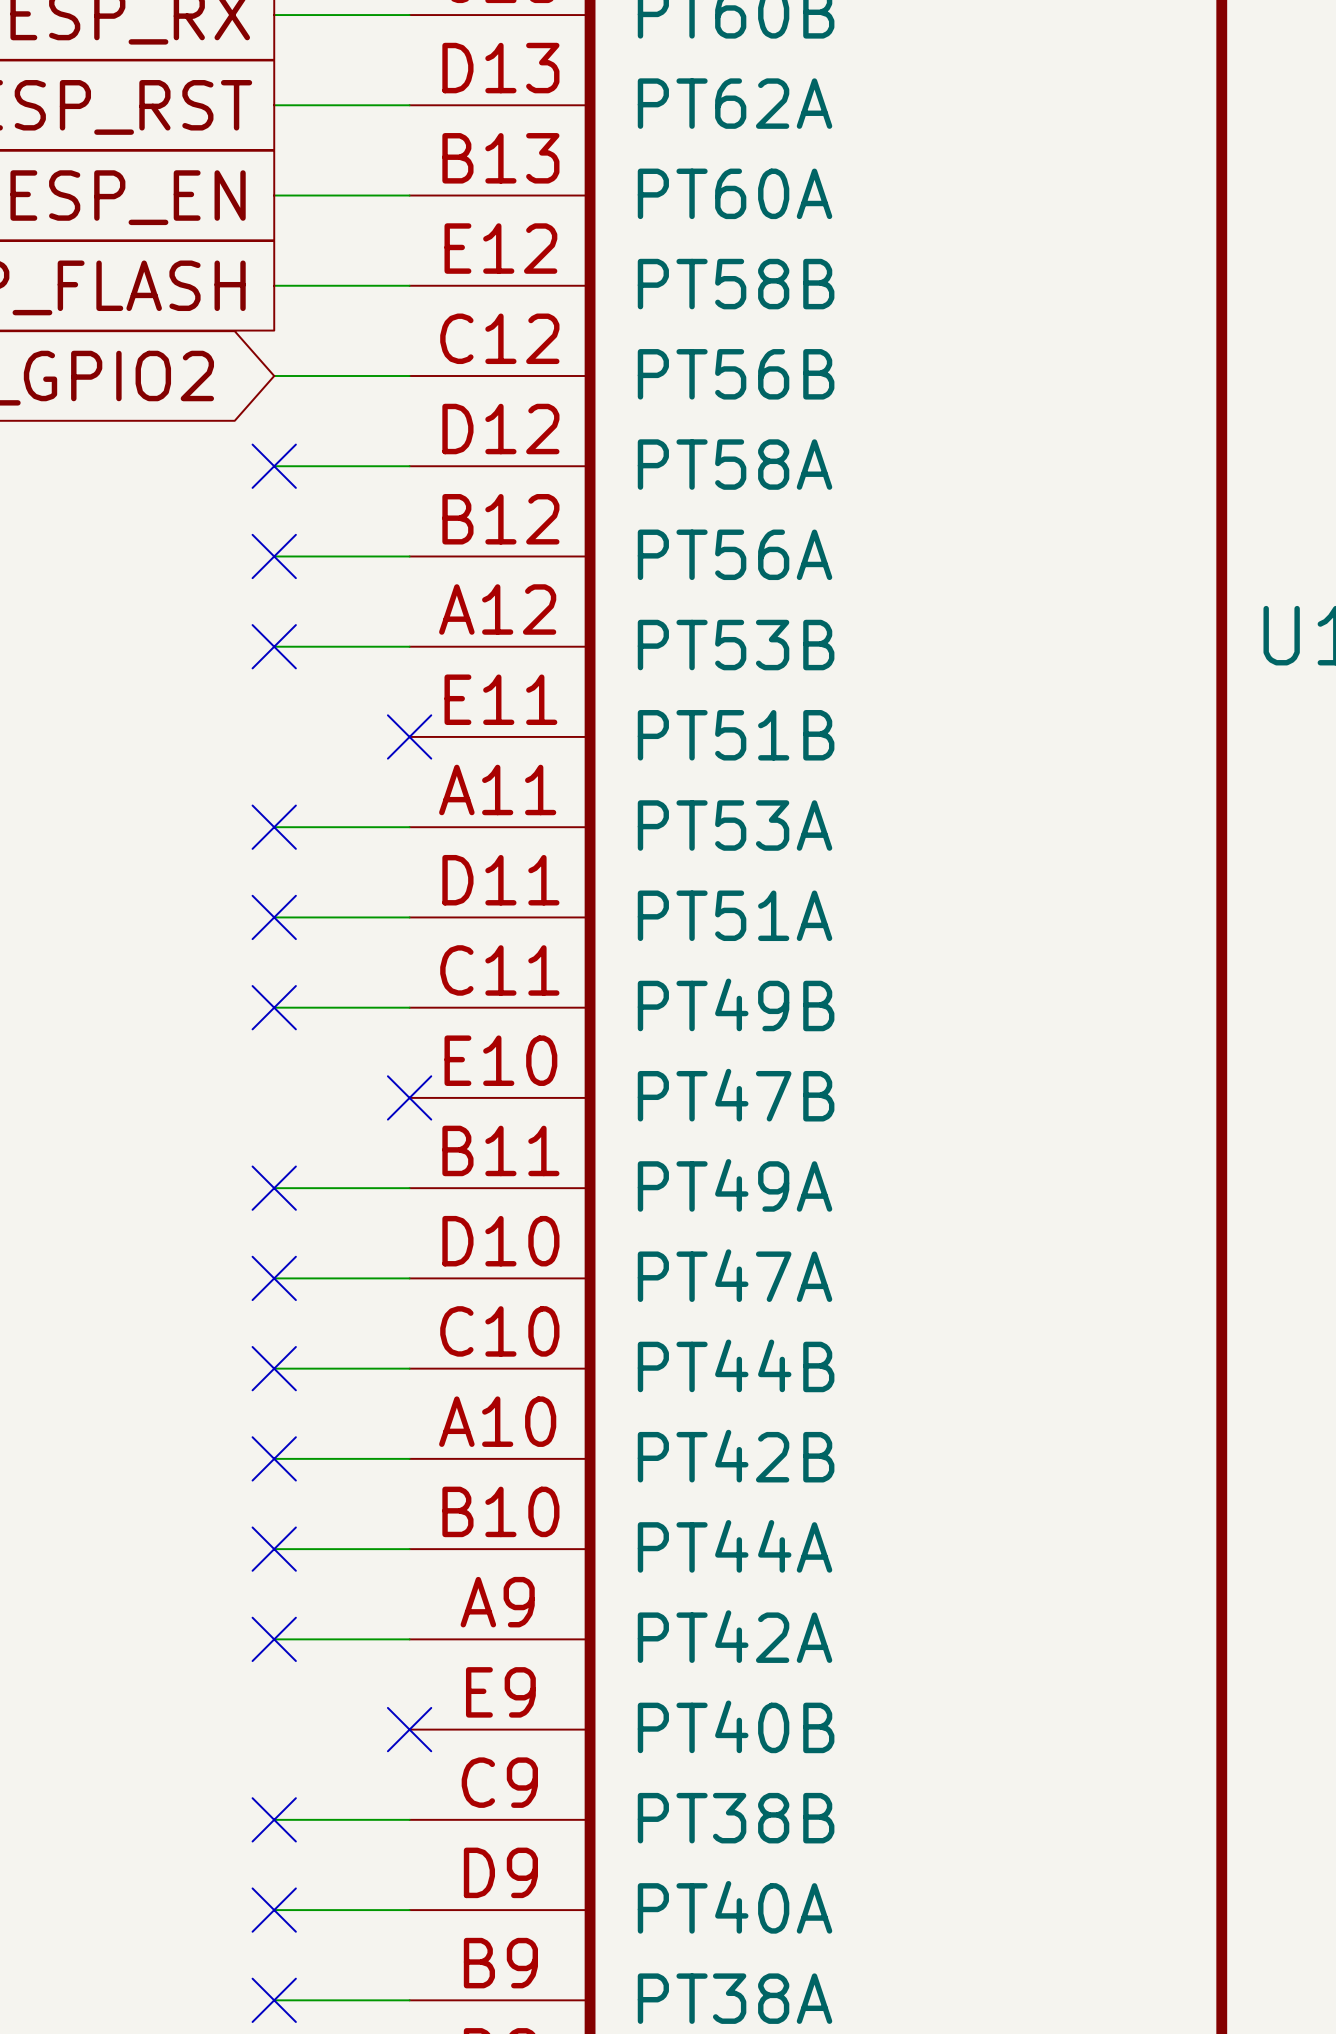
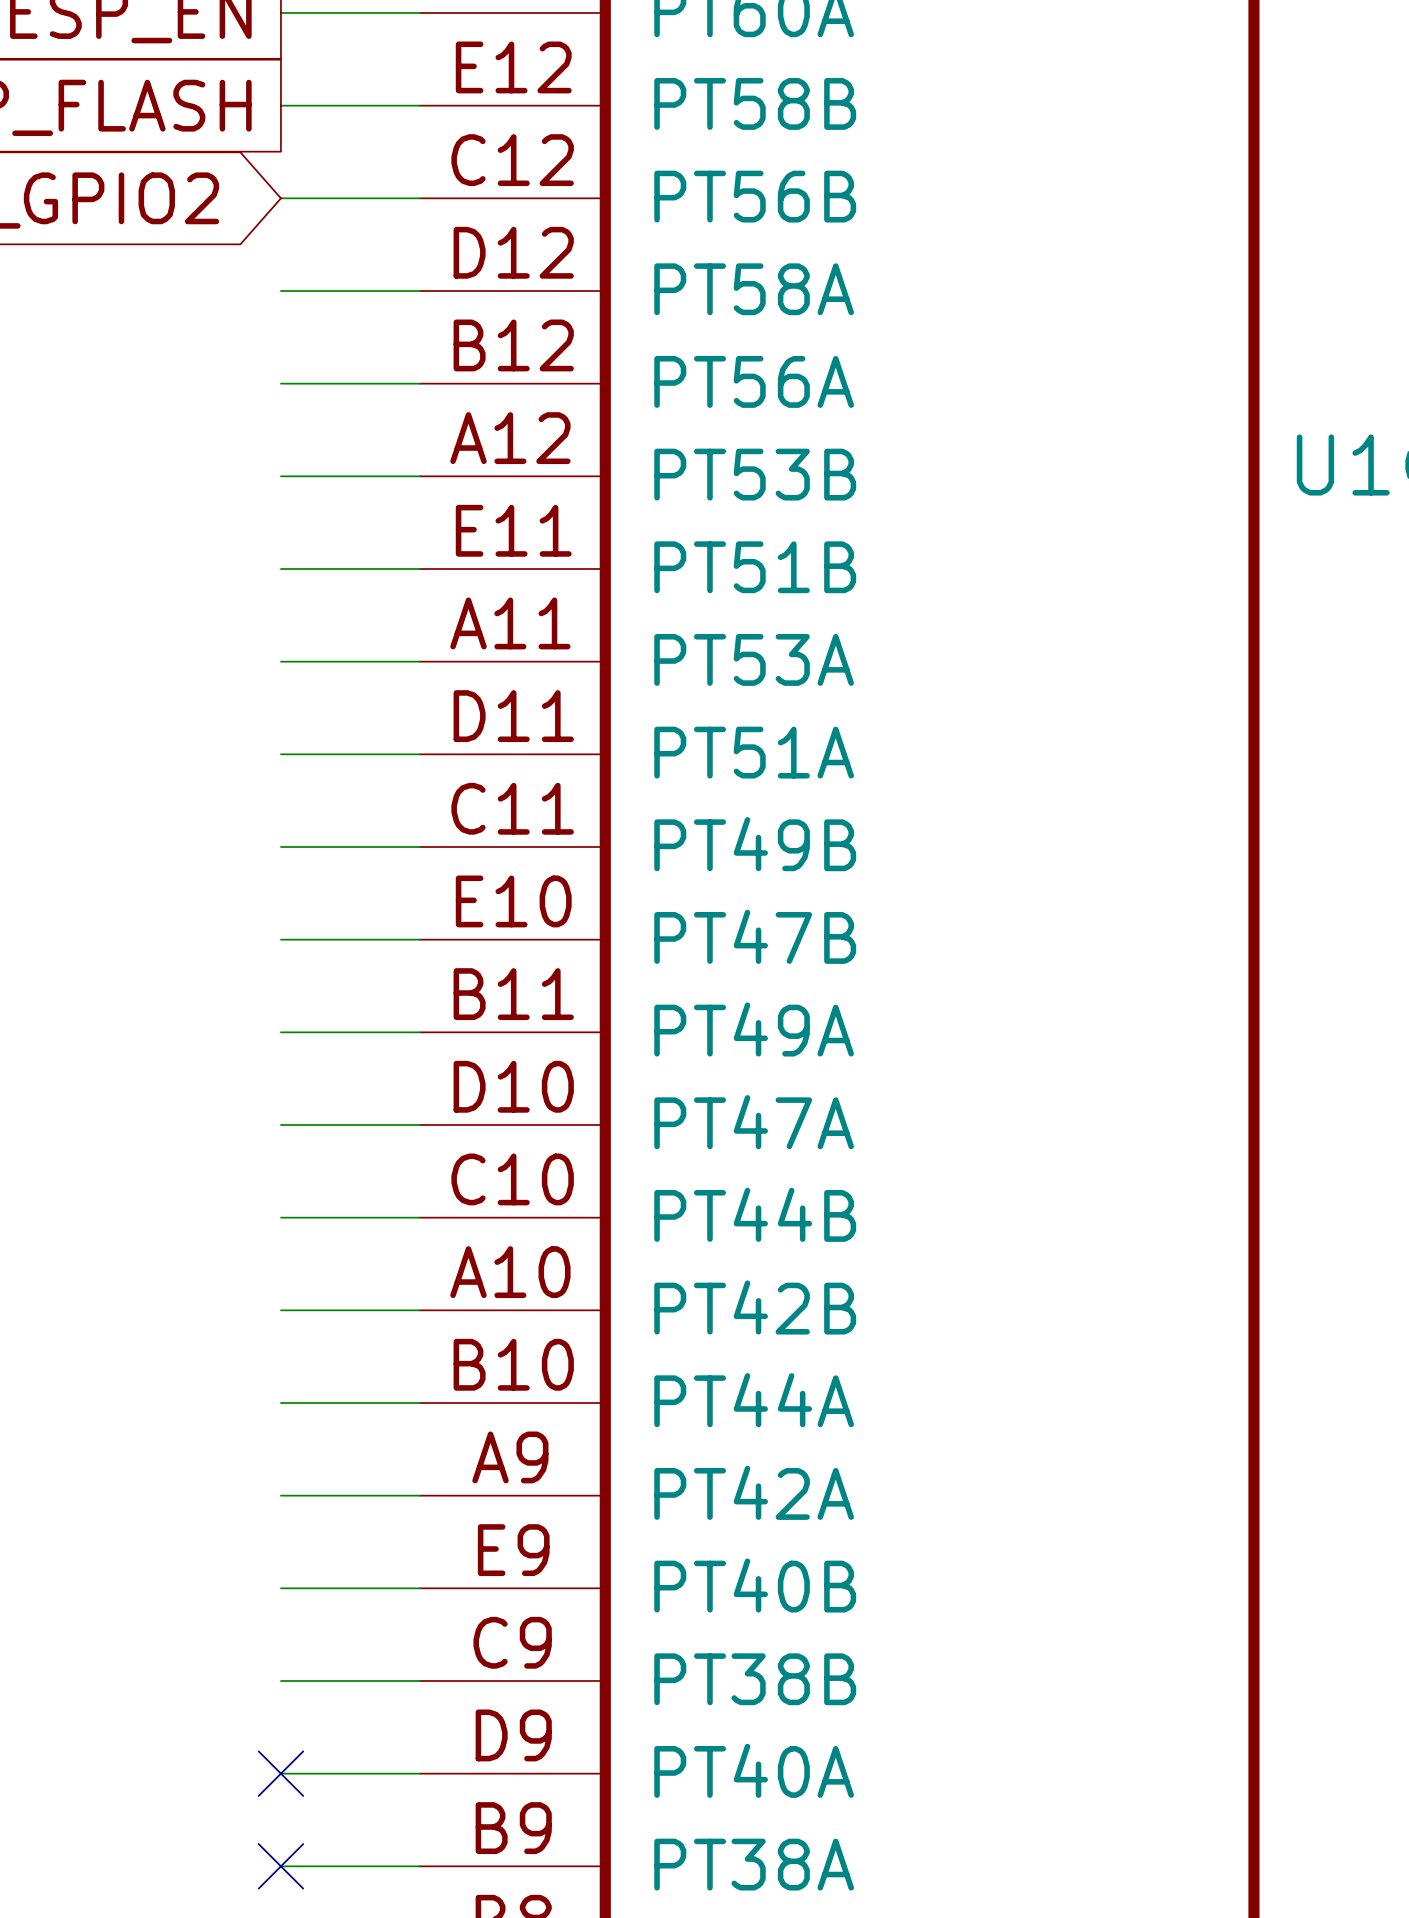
no-connect mark: (274, 466) -> none
no-connect mark: (274, 556) -> none
no-connect mark: (274, 646) -> none
wire: none -> (280, 568) (419, 568)
no-connect mark: (409, 736) -> none
no-connect mark: (274, 827) -> none
no-connect mark: (274, 917) -> none
no-connect mark: (274, 1007) -> none
wire: none -> (280, 939) (419, 939)
no-connect mark: (409, 1097) -> none
no-connect mark: (274, 1188) -> none
no-connect mark: (274, 1278) -> none
no-connect mark: (274, 1368) -> none
no-connect mark: (274, 1458) -> none
no-connect mark: (274, 1549) -> none
no-connect mark: (274, 1639) -> none
wire: none -> (280, 1588) (419, 1588)
no-connect mark: (409, 1729) -> none
no-connect mark: (274, 1819) -> none

